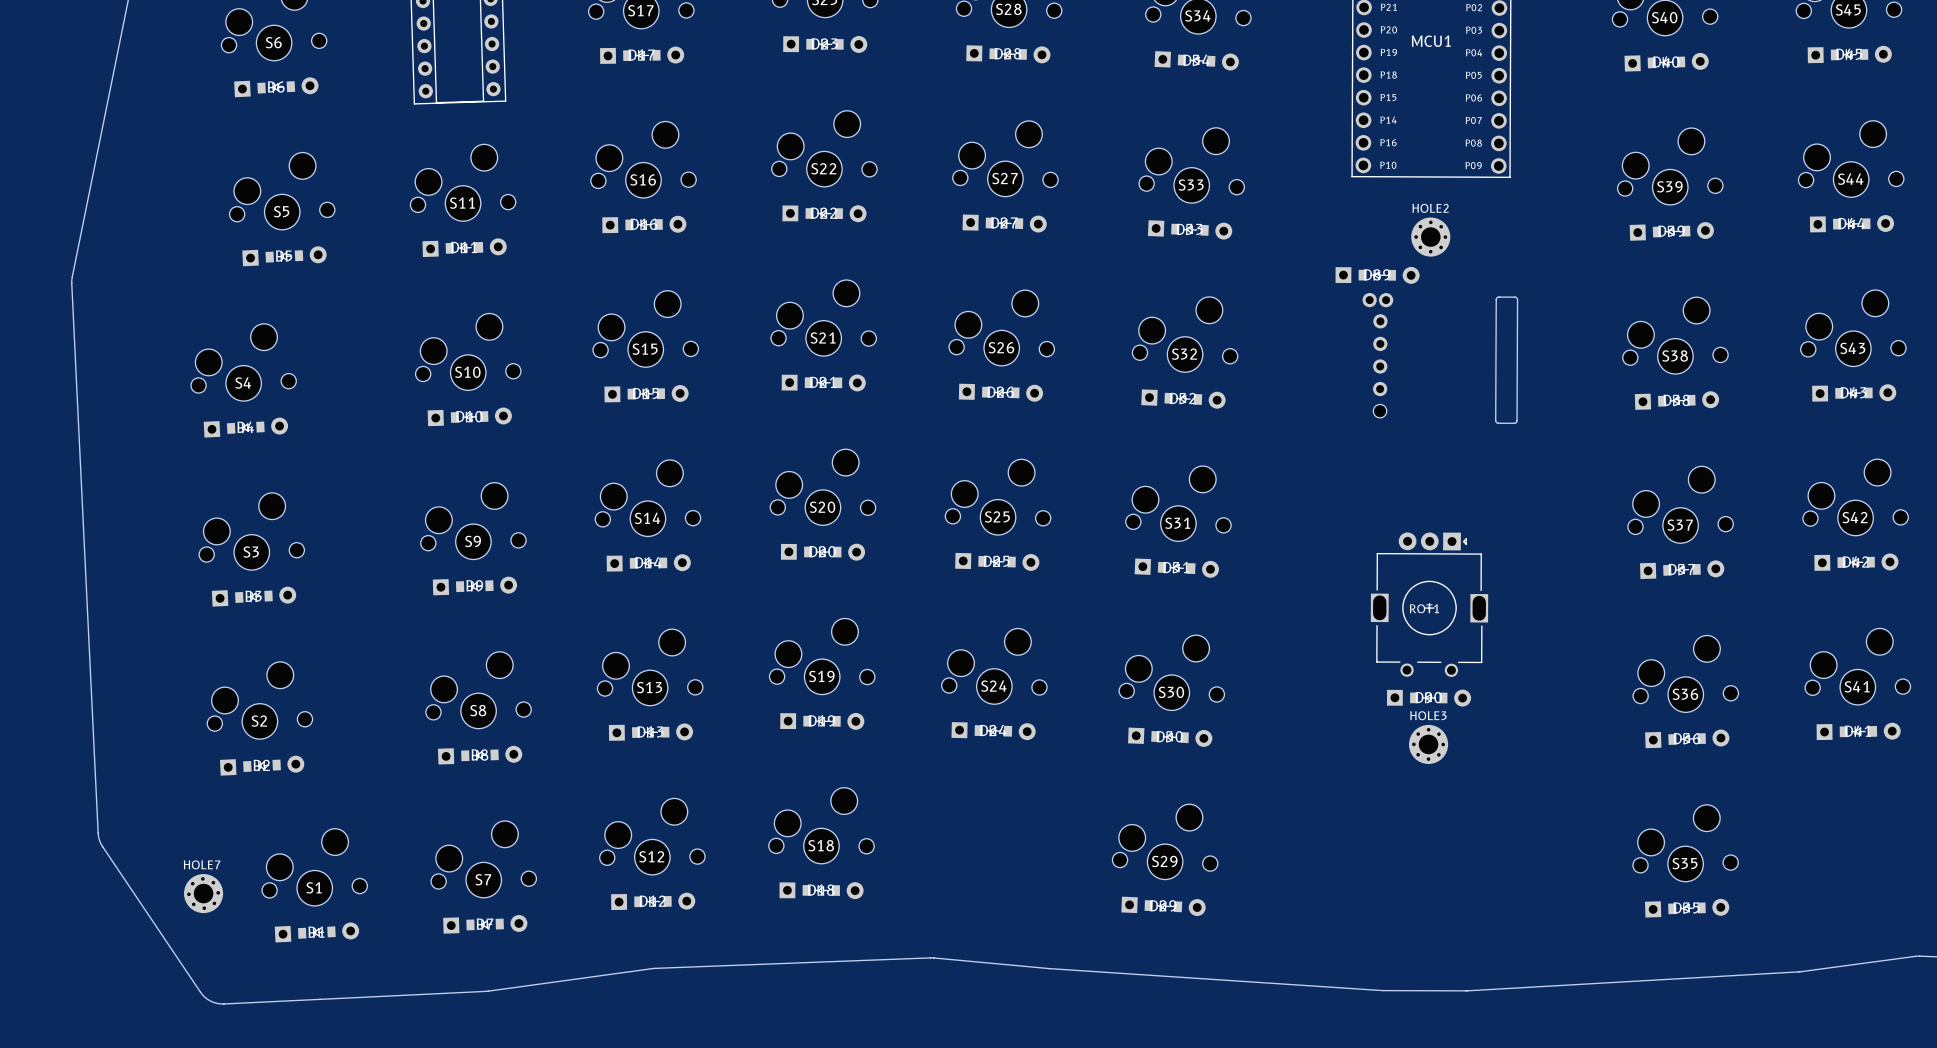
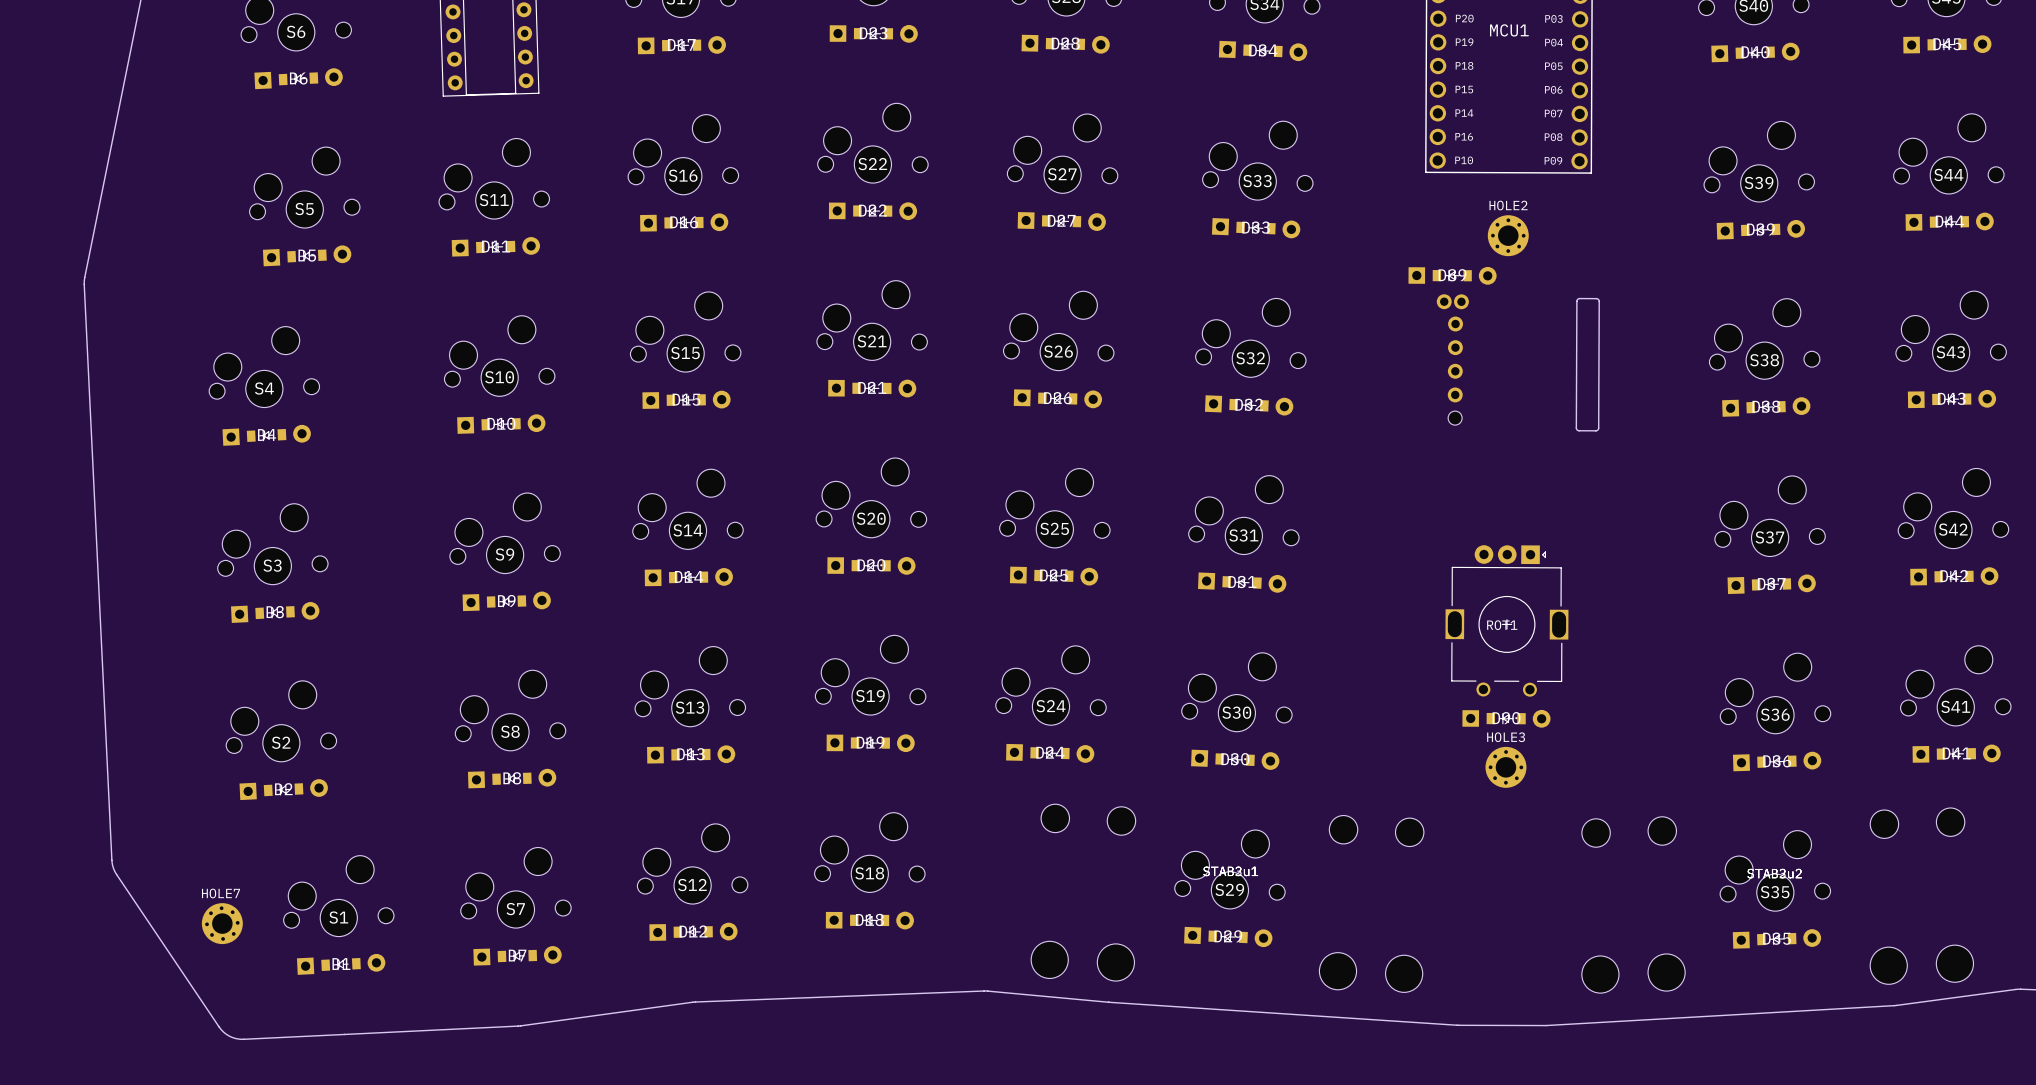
part: none -> (1227, 898)
part: none -> (1227, 898)
part: none -> (1777, 900)
part: none -> (1777, 900)

